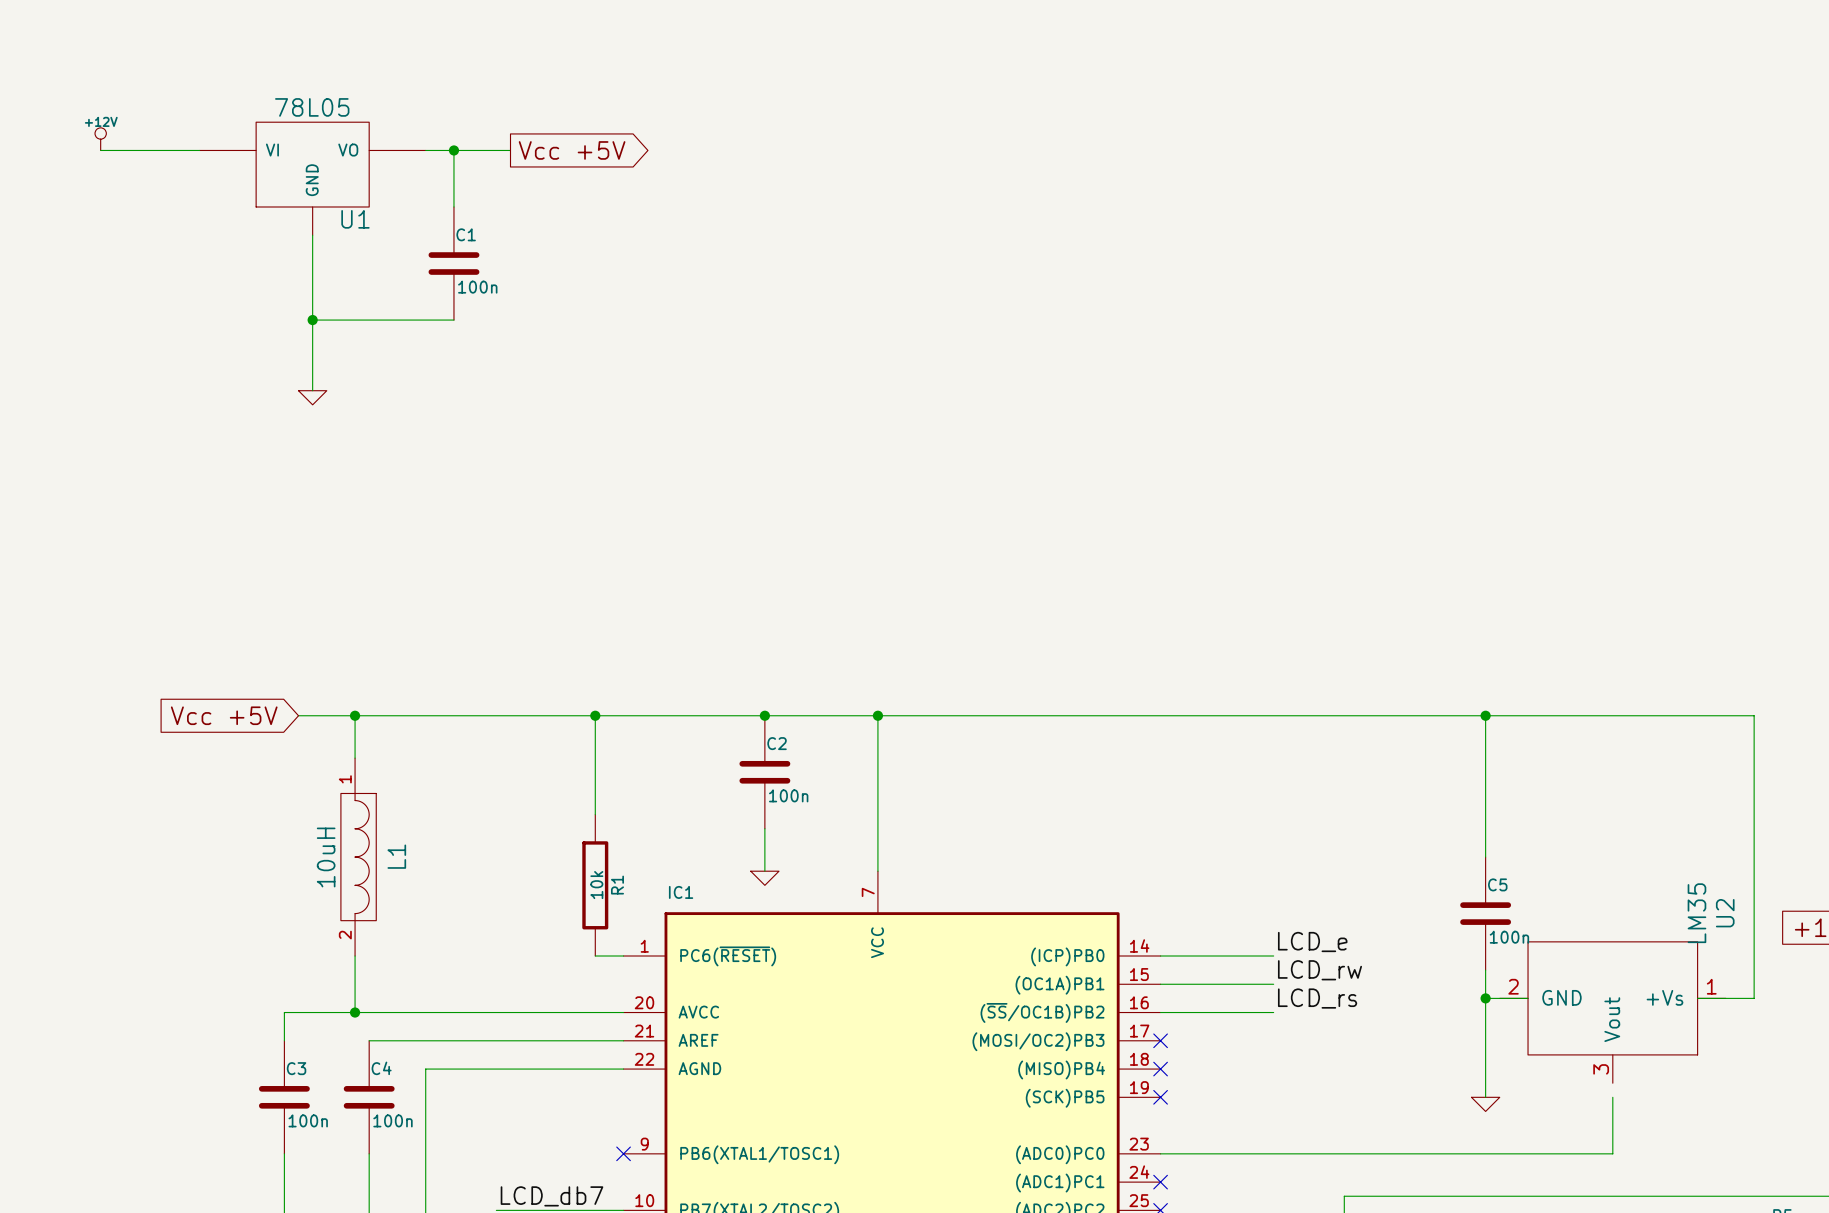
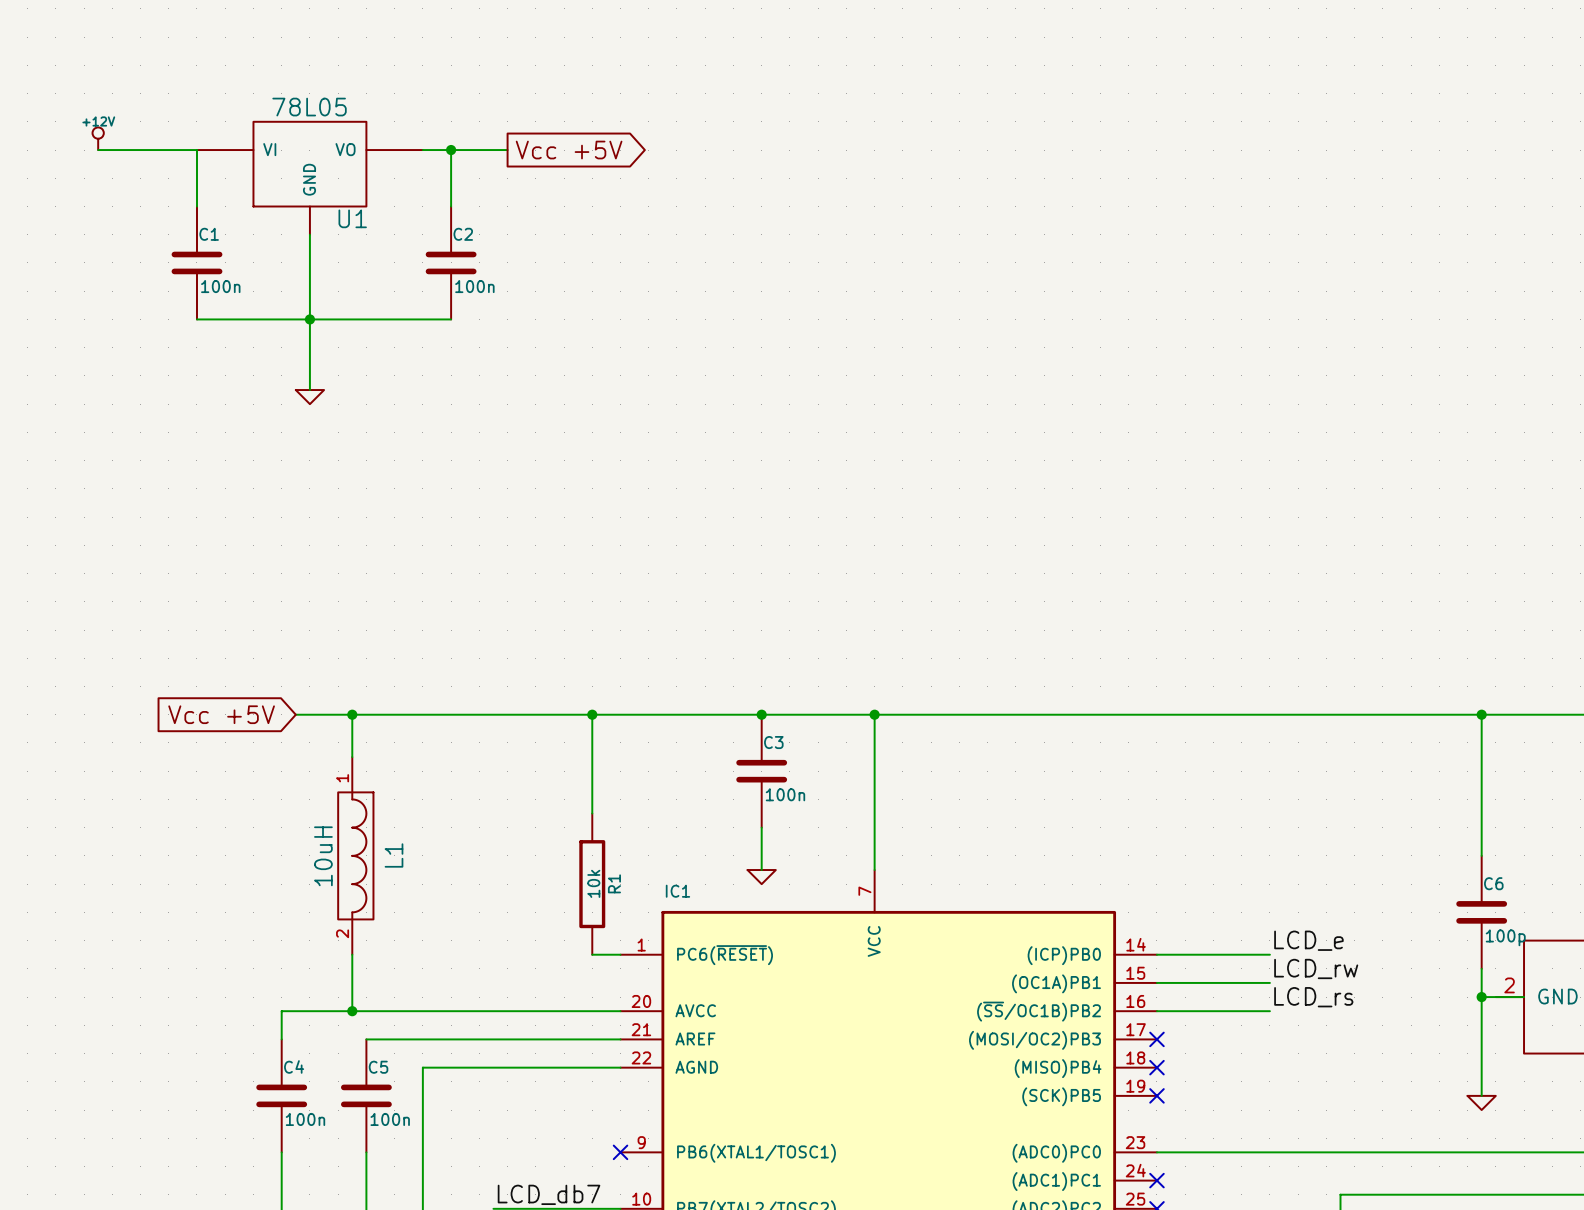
wire: none -> (196, 150) (196, 206)
C1 name: C1 (466, 234) -> C2 (463, 234)
C1: none -> 100n (196, 262)
wire: none -> (196, 319) (309, 319)
C2 name: C2 (777, 743) -> C3 (773, 742)
C5 name: C5 (1497, 884) -> C6 (1493, 883)
C5 value: 100n (1509, 937) -> 100p (1505, 937)
C3 name: C3 (296, 1068) -> C4 (294, 1066)
C4 name: C4 (381, 1068) -> C5 (378, 1067)

